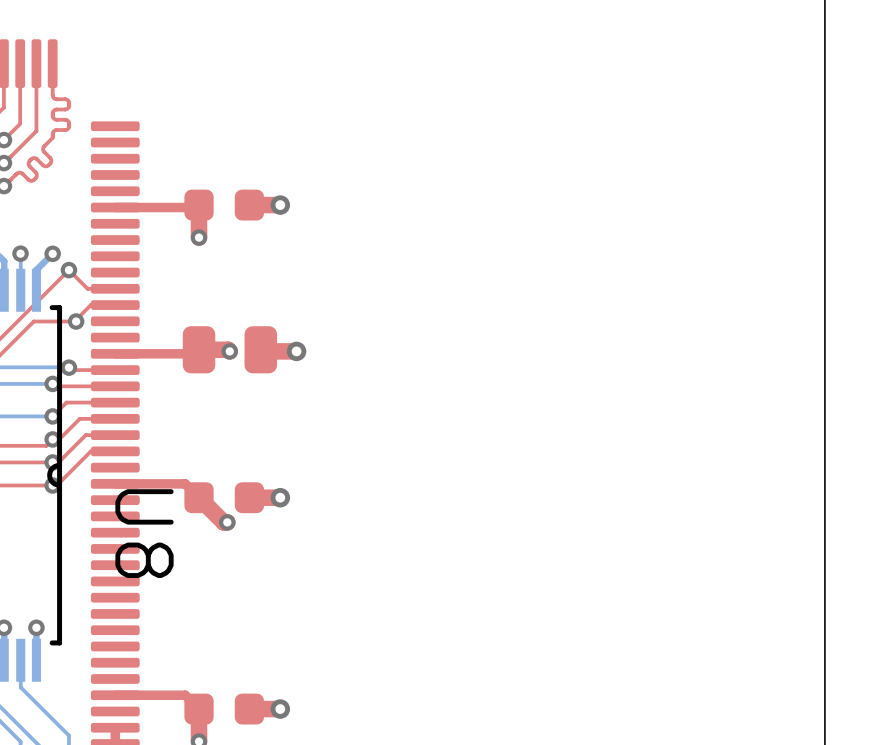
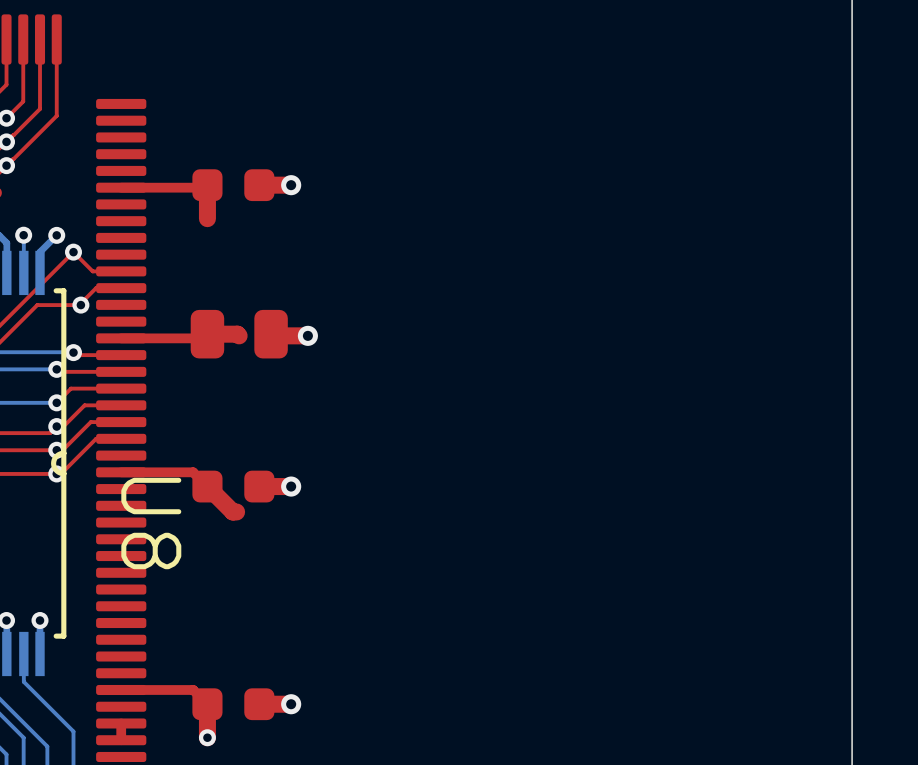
top track: (52, 95) (55, 99) (66, 99) (69, 103) (67, 108) (55, 109) (52, 113) -> (56, 71) (56, 90)
top track: (52, 115) (55, 119) (66, 120) (69, 123) (67, 129) (55, 130) (52, 134) -> (56, 93) (56, 112)
top track: (44, 146) (43, 151) (51, 159) (48, 165) (44, 166) (36, 158) (31, 159) -> (48, 124) (34, 138)
top track: (29, 160) (29, 165) (36, 174) (34, 179) (29, 180) (21, 173) (16, 173) -> (33, 139) (19, 152)
via: (199, 237) -> none
via: (229, 351) -> none
via: (227, 522) -> none

